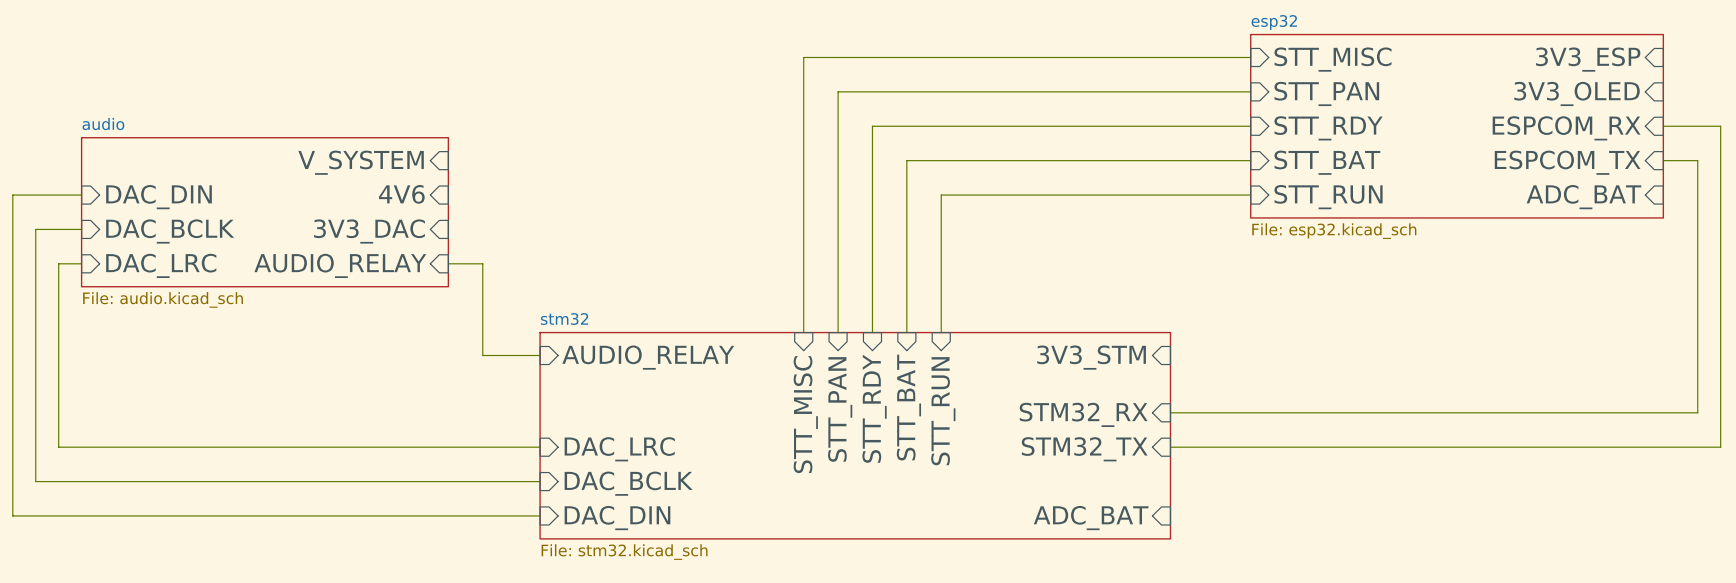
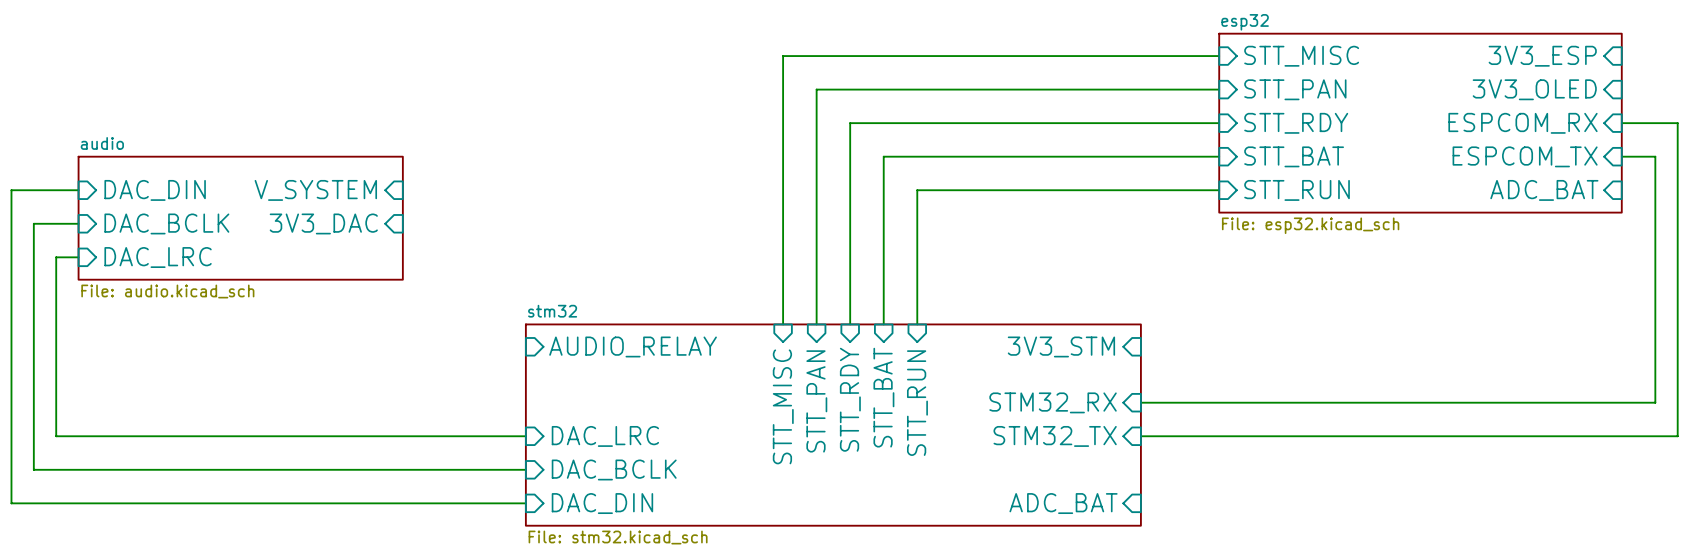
sheet pin position: V_SYSTEM (361, 162) -> V_SYSTEM (315, 190)
sheet pin: 4V6 (401, 194) -> none
sheet audio: File: audio.kicad_sch (264, 212) -> none
sheet audio: none -> File: audio.kicad_sch (240, 218)
sheet pin position: 3V3_DAC (369, 231) -> 3V3_DAC (323, 223)
wire: (448, 263) (482, 263) (482, 355) (540, 355) -> none
sheet pin: AUDIO_RELAY (340, 265) -> none

